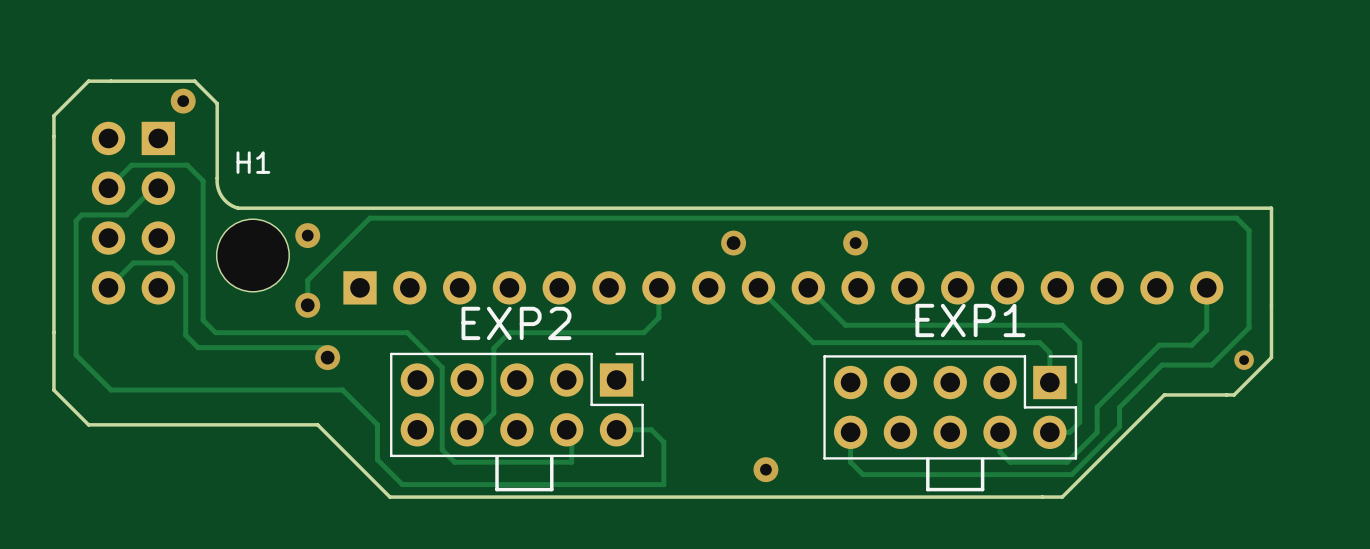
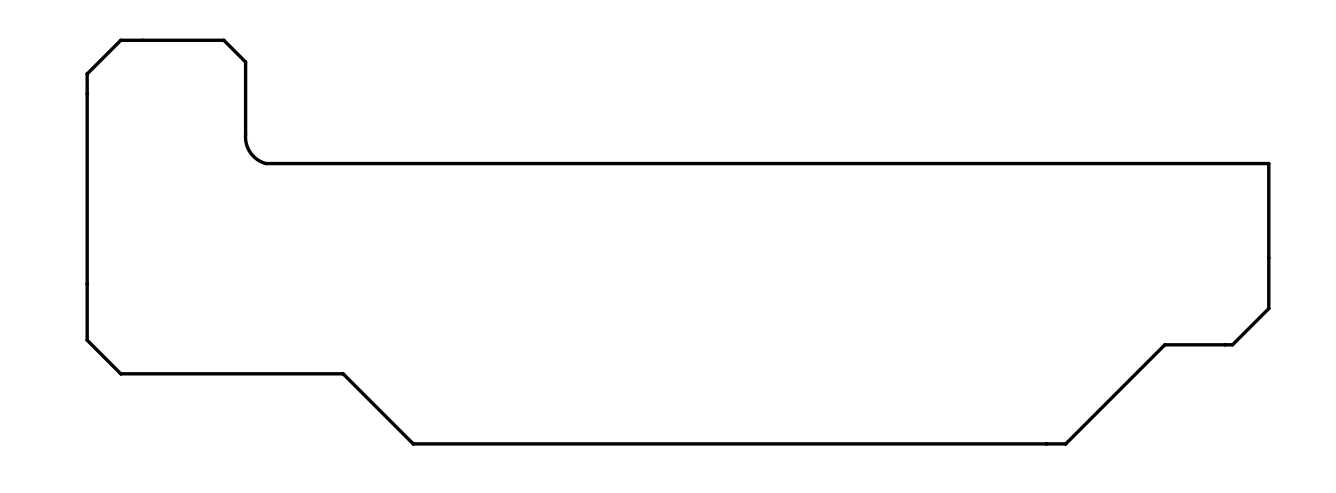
via: (183, 101) -> none
track: (108, 188) (131, 165) (187, 165) (203, 181) (203, 320) (215, 332) (407, 332) (442, 367) (442, 449) (454, 462) (571, 462) (571, 434) (566, 429) -> none
track: (158, 188) (153, 188) (126, 214) (81, 214) (76, 220) (76, 355) (110, 389) (342, 389) (377, 424) (377, 459) (402, 484) (663, 484) (663, 442) (651, 429) (616, 429) -> none
part: (133, 213) -> none
via: (307, 235) -> none
via: (733, 243) -> none
via: (855, 243) -> none
H1: (252, 255) -> none
track: (108, 287) (133, 262) (173, 262) (185, 275) (185, 335) (198, 347) (327, 347) (327, 357) -> none
track: (658, 287) (658, 317) (643, 332) (509, 332) (493, 348) (493, 413) (477, 429) (467, 429) -> none
track: (758, 287) (813, 342) (1039, 342) (1049, 352) (1049, 382) -> none
part: (783, 287) -> none
track: (808, 287) (845, 325) (1062, 325) (1079, 342) (1079, 422) (1069, 432) (1049, 432) -> none
track: (1206, 287) (1206, 330) (1191, 345) (1159, 345) (1097, 407) (1097, 432) (1067, 462) (1010, 462) (1000, 452) (1000, 432) -> none
track: (307, 305) (307, 280) (369, 218) (1236, 218) (1249, 230) (1249, 327) (1211, 365) (1161, 365) (1119, 407) (1119, 426) (1071, 474) (863, 474) (850, 462) (850, 432) -> none
via: (307, 305) -> none
via: (327, 357) -> none
via: (1244, 360) -> none
EXP2: (516, 404) -> none
EXP1: (950, 407) -> none
line: (496, 457) (496, 489) (551, 489) (551, 457) -> none
line: (927, 459) (927, 489) (982, 489) (982, 459) -> none
via: (765, 469) -> none

